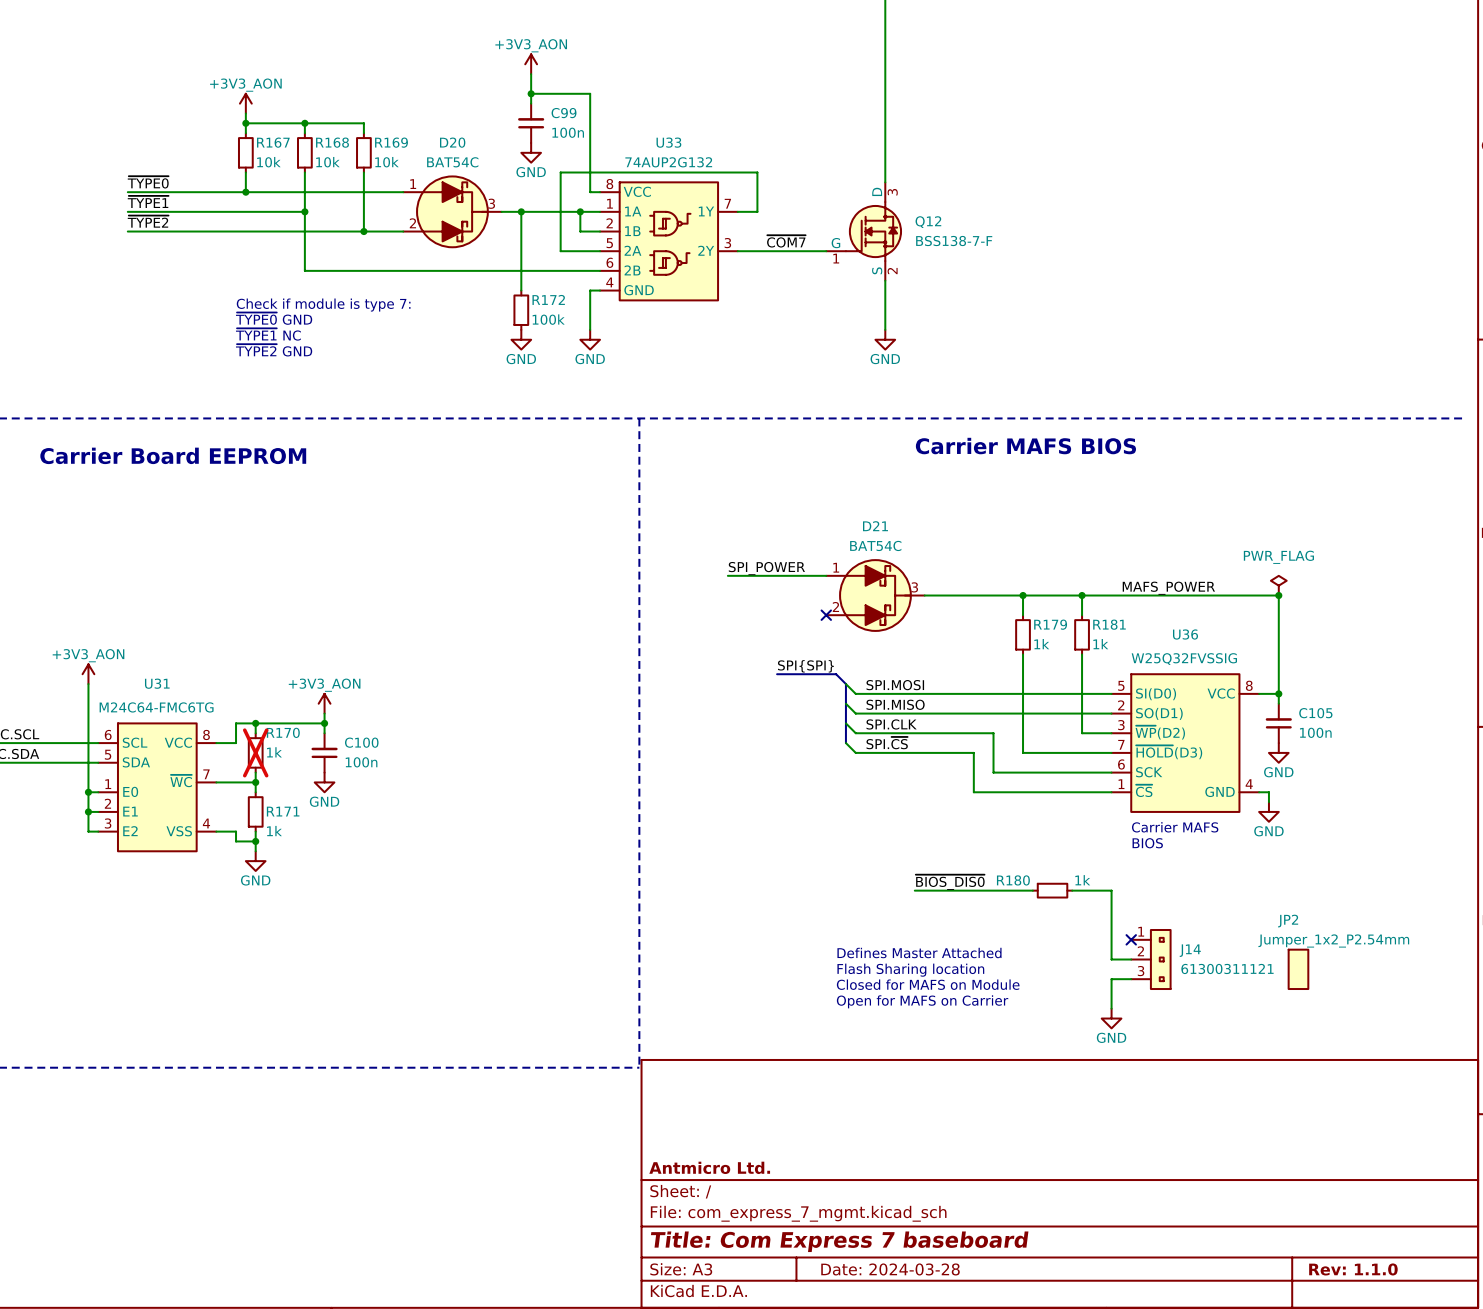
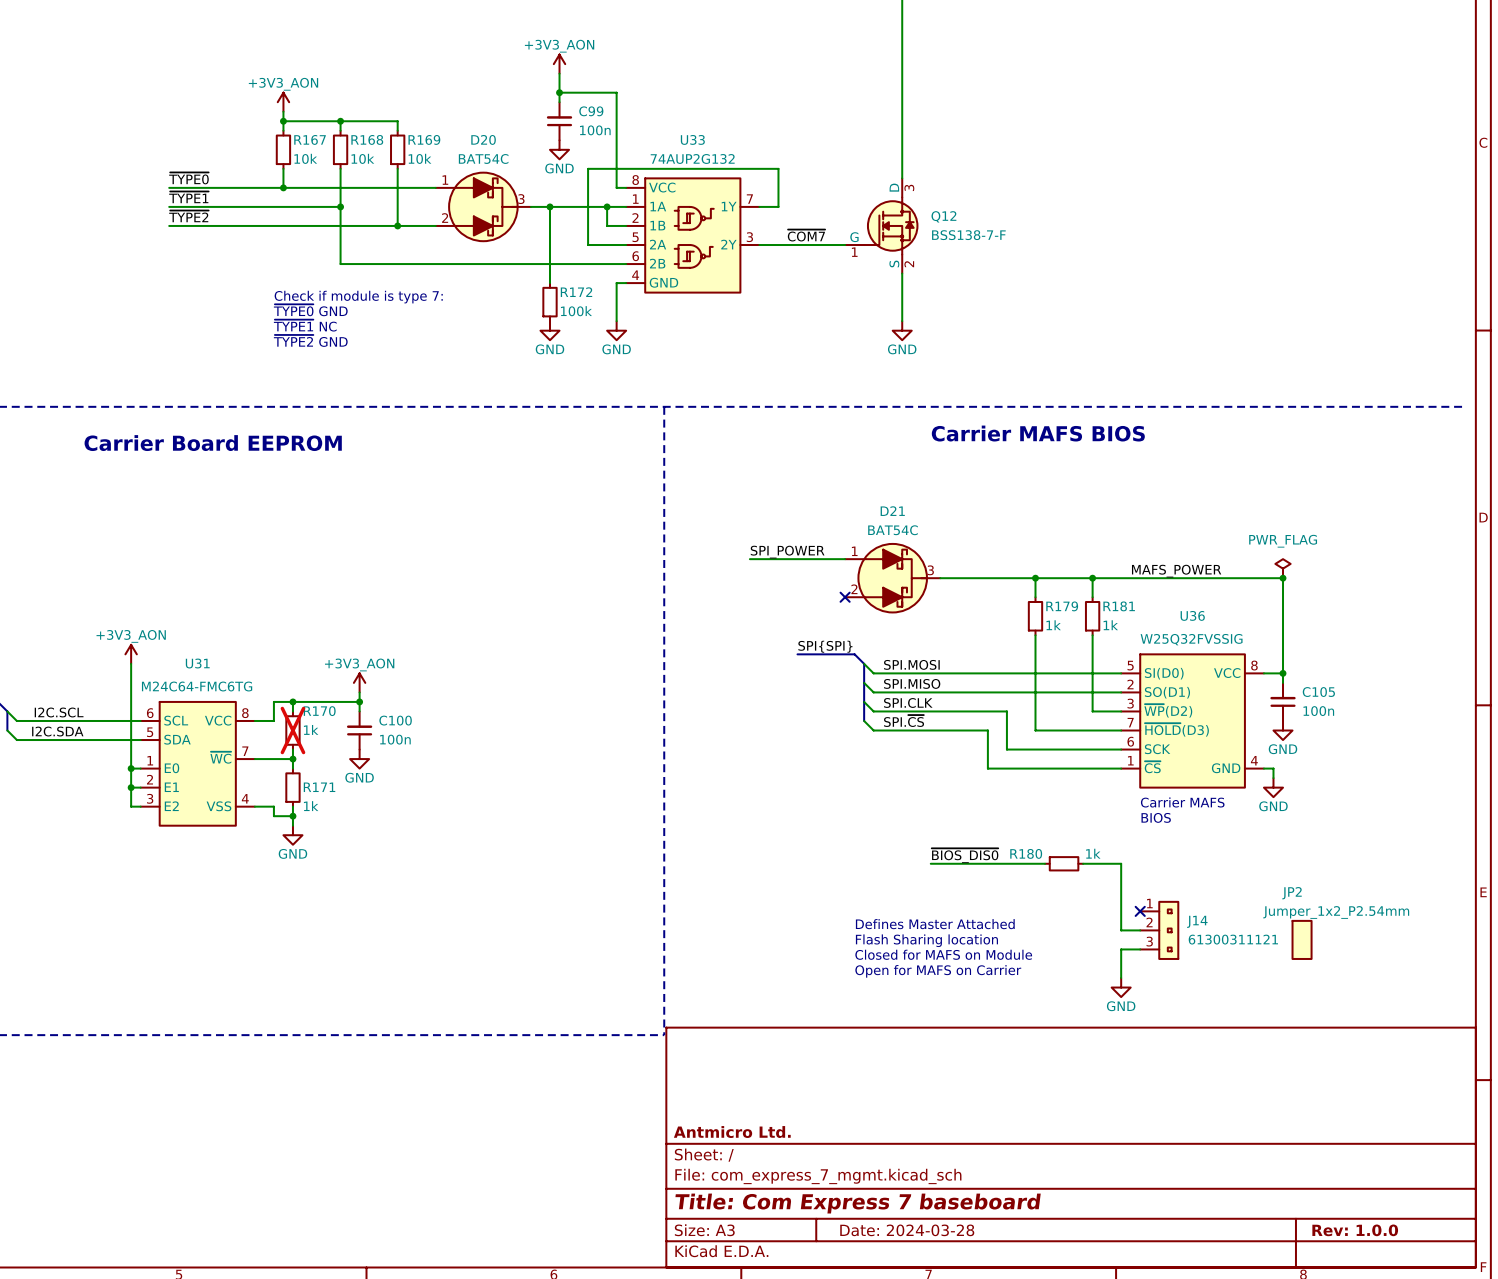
title block: Rev: 1.1.0 (1353, 1269) -> Rev: 1.0.0 (1355, 1230)

